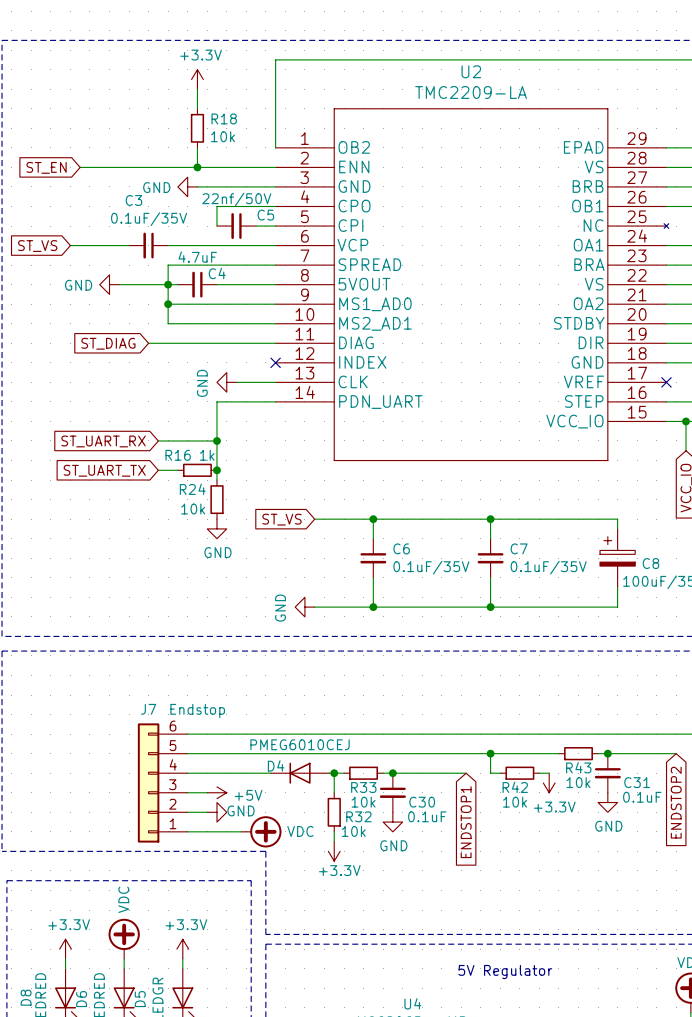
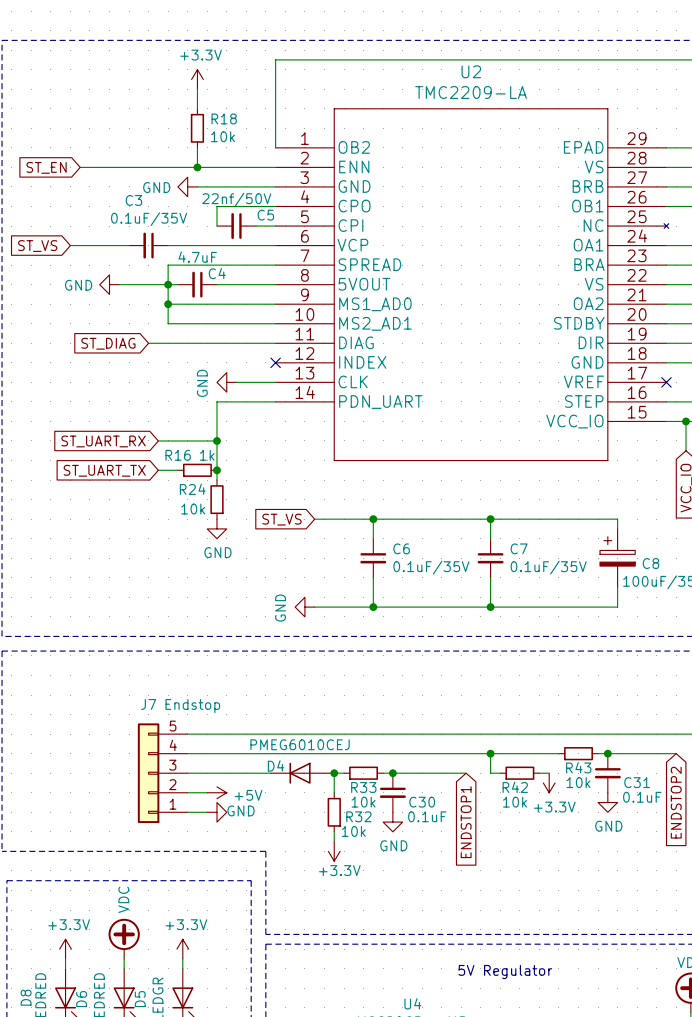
J7 symbol: [137, 723, 188, 843] -> [137, 723, 188, 824]
wire: (187, 831) (241, 831) -> none
power symbol: VDC (261, 831) -> none

